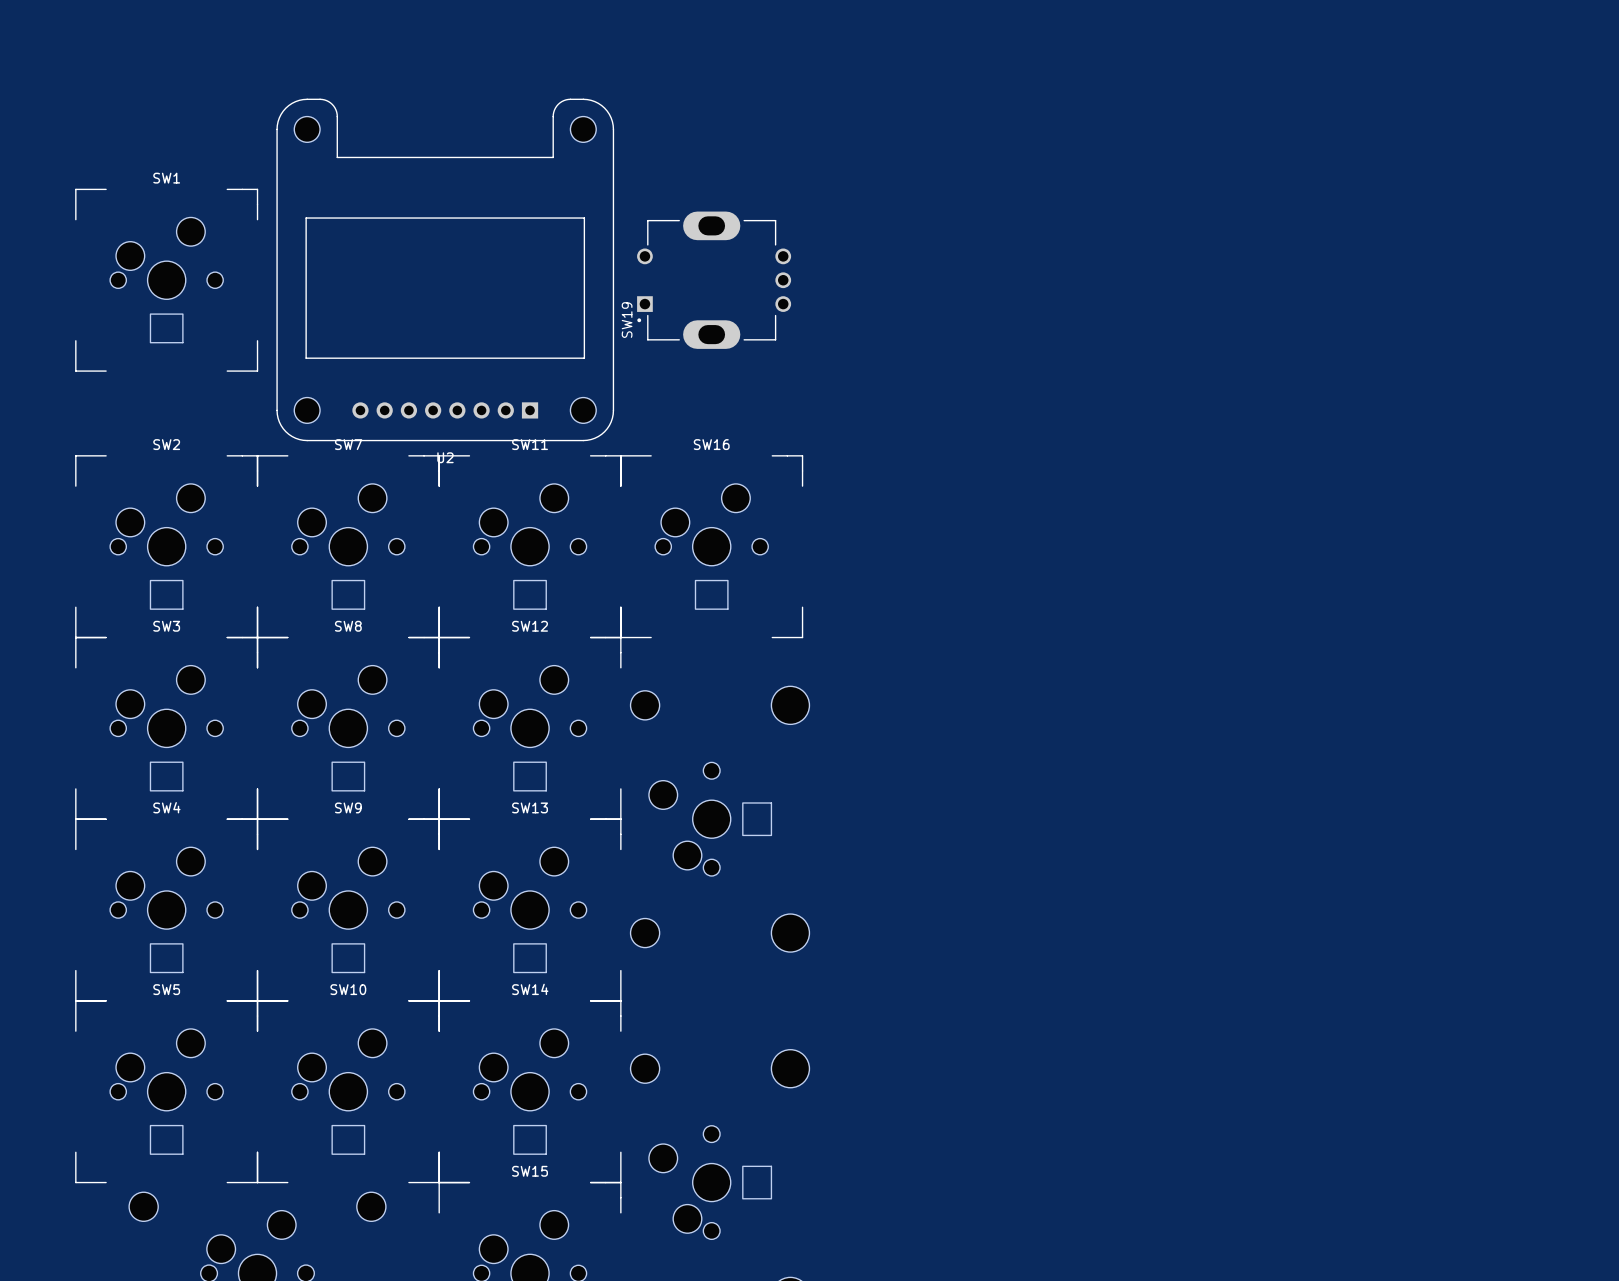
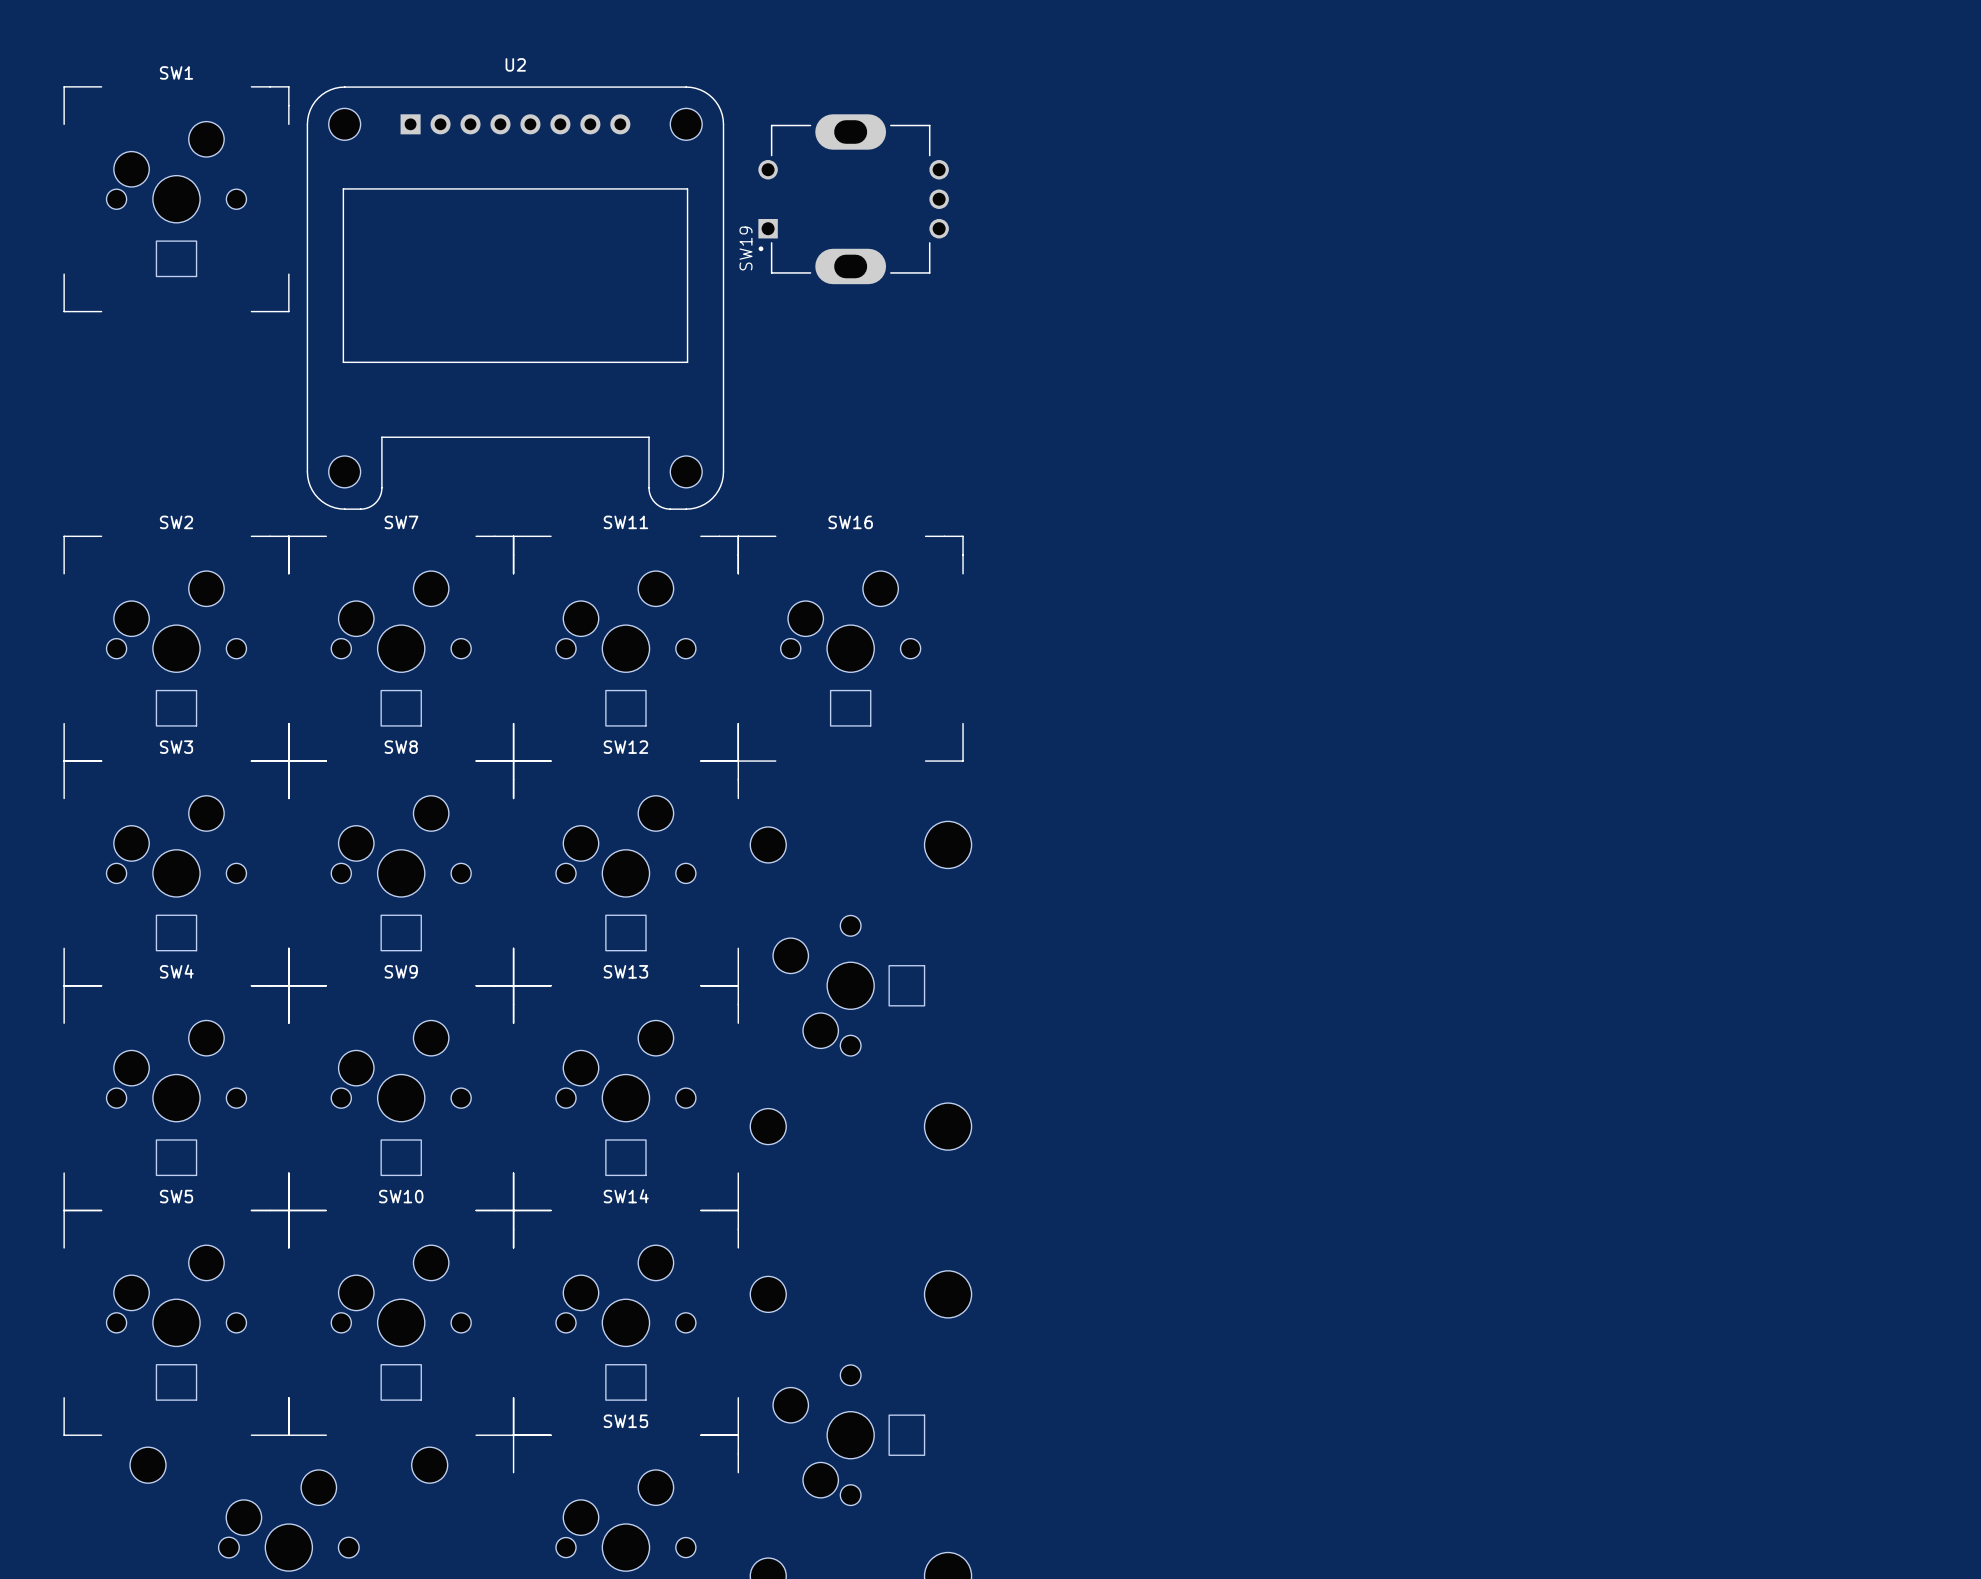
U2 rotation: 0° (445, 269) -> 180° (515, 298)
SW1 position: (166, 280) -> (176, 199)
SW19 position: (714, 280) -> (853, 199)

